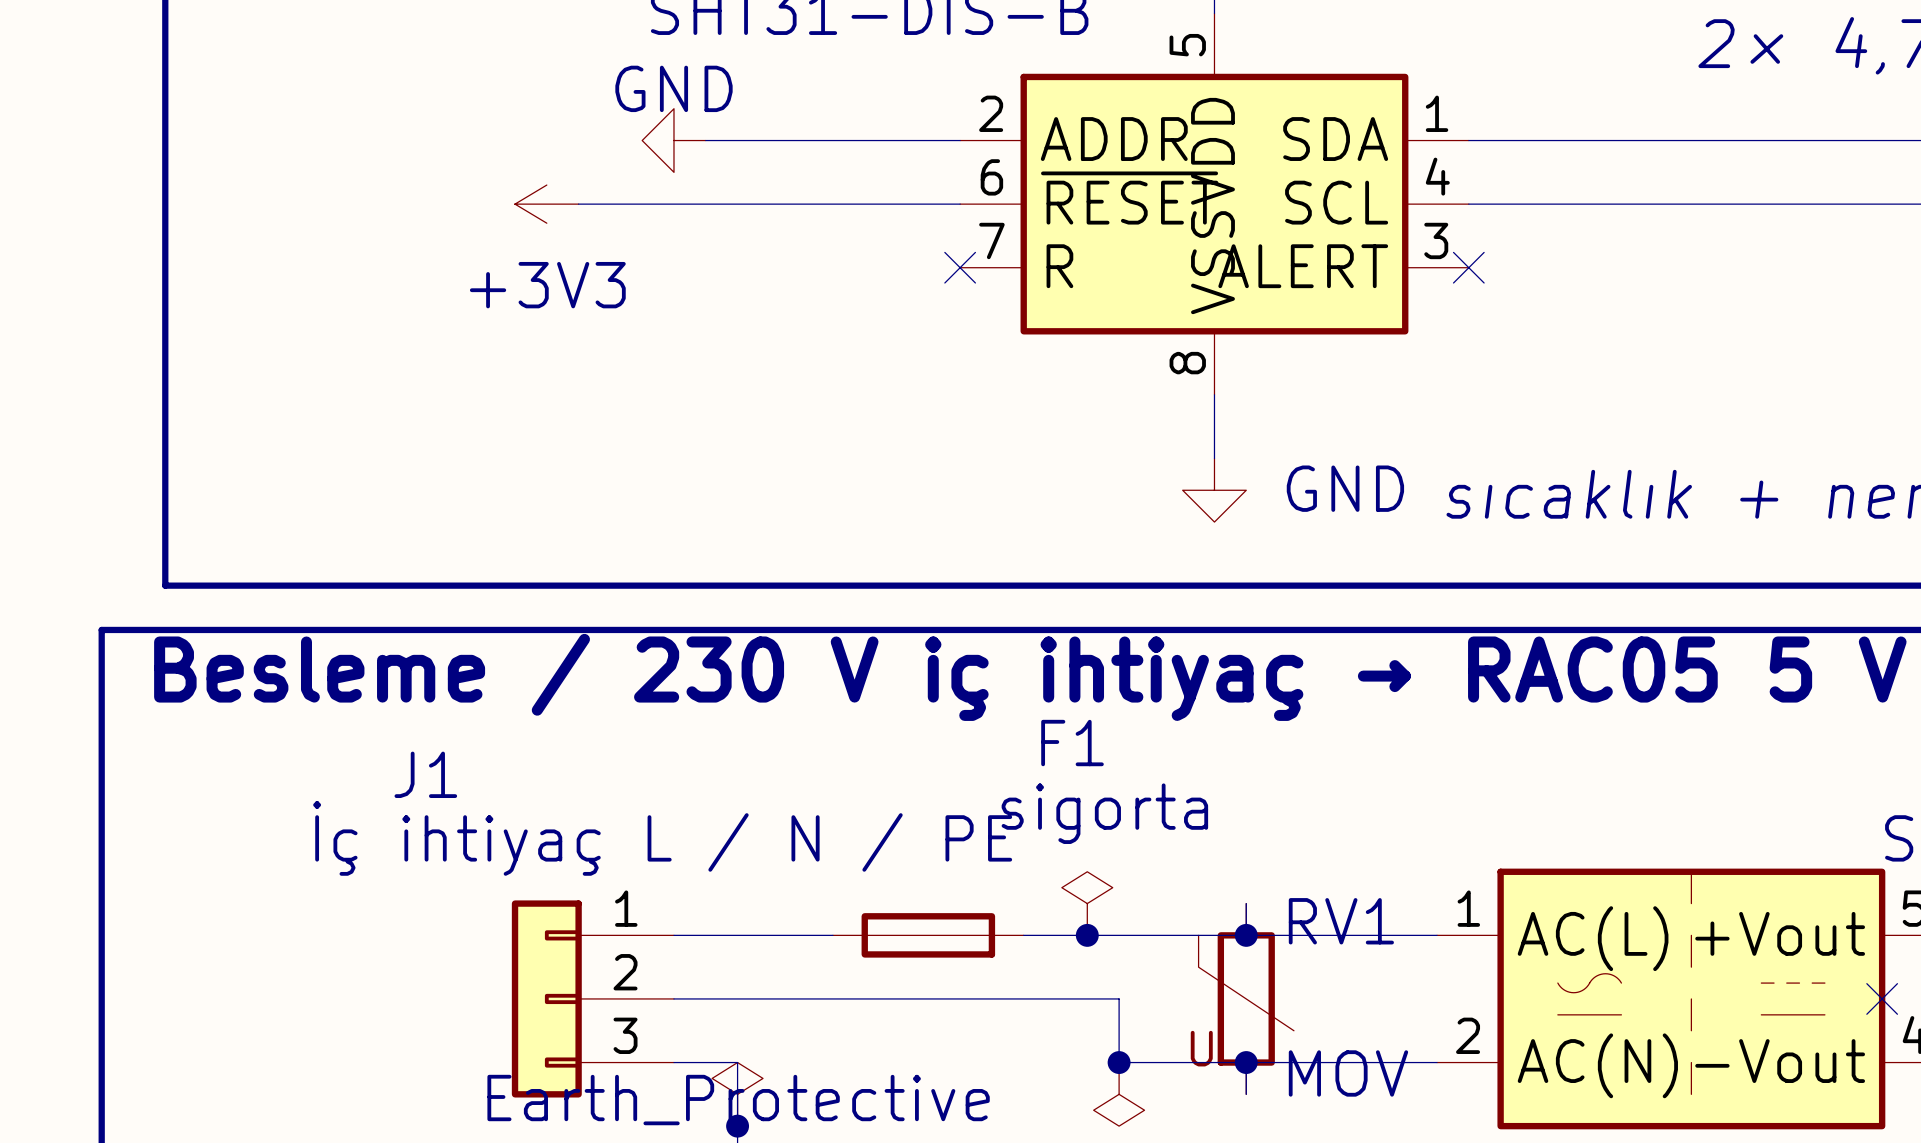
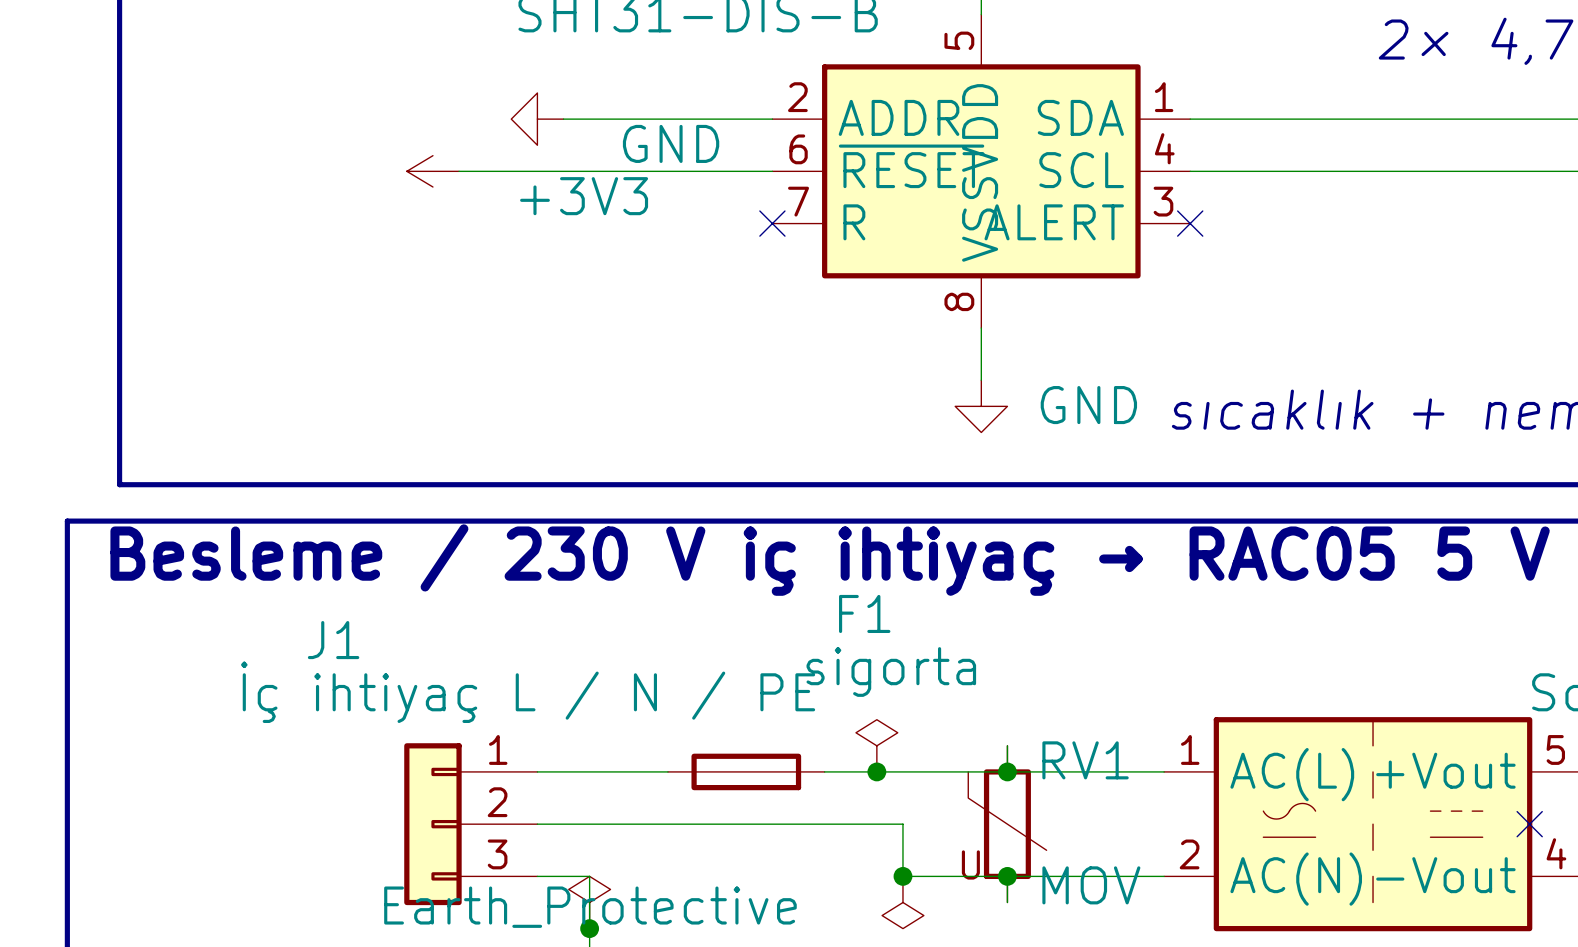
power symbol text position: GND (673, 88) -> GND (671, 143)
power symbol text position: +3V3 (547, 285) -> +3V3 (584, 196)

